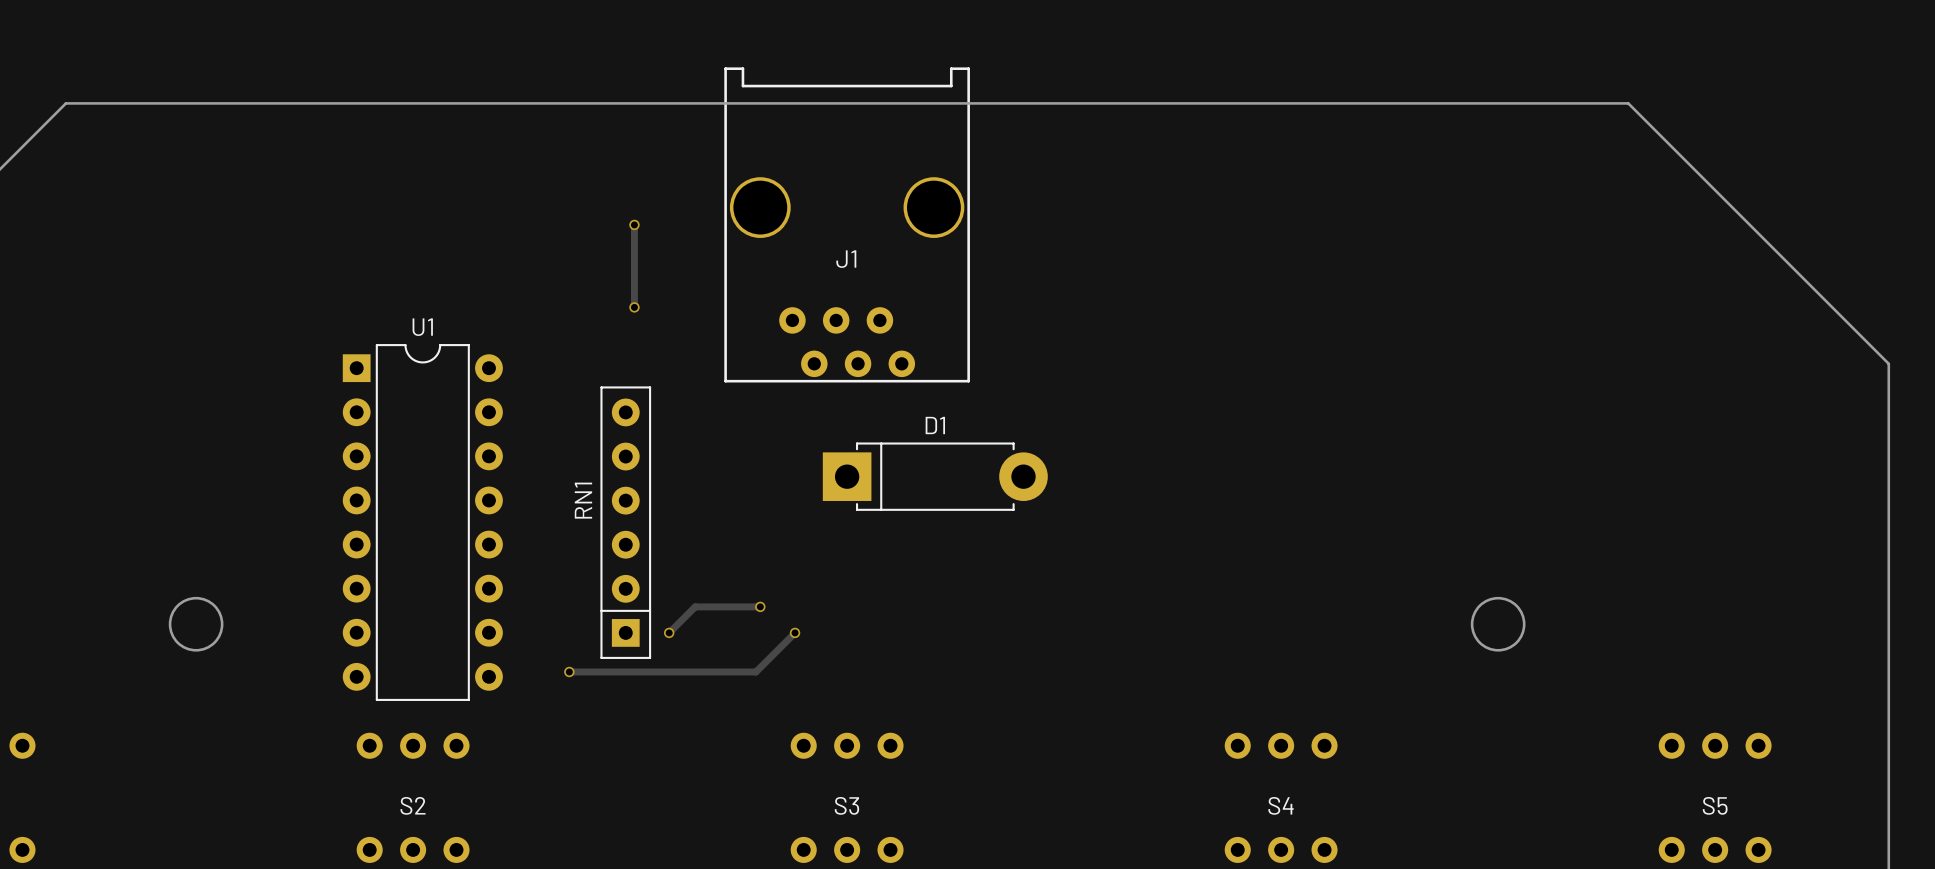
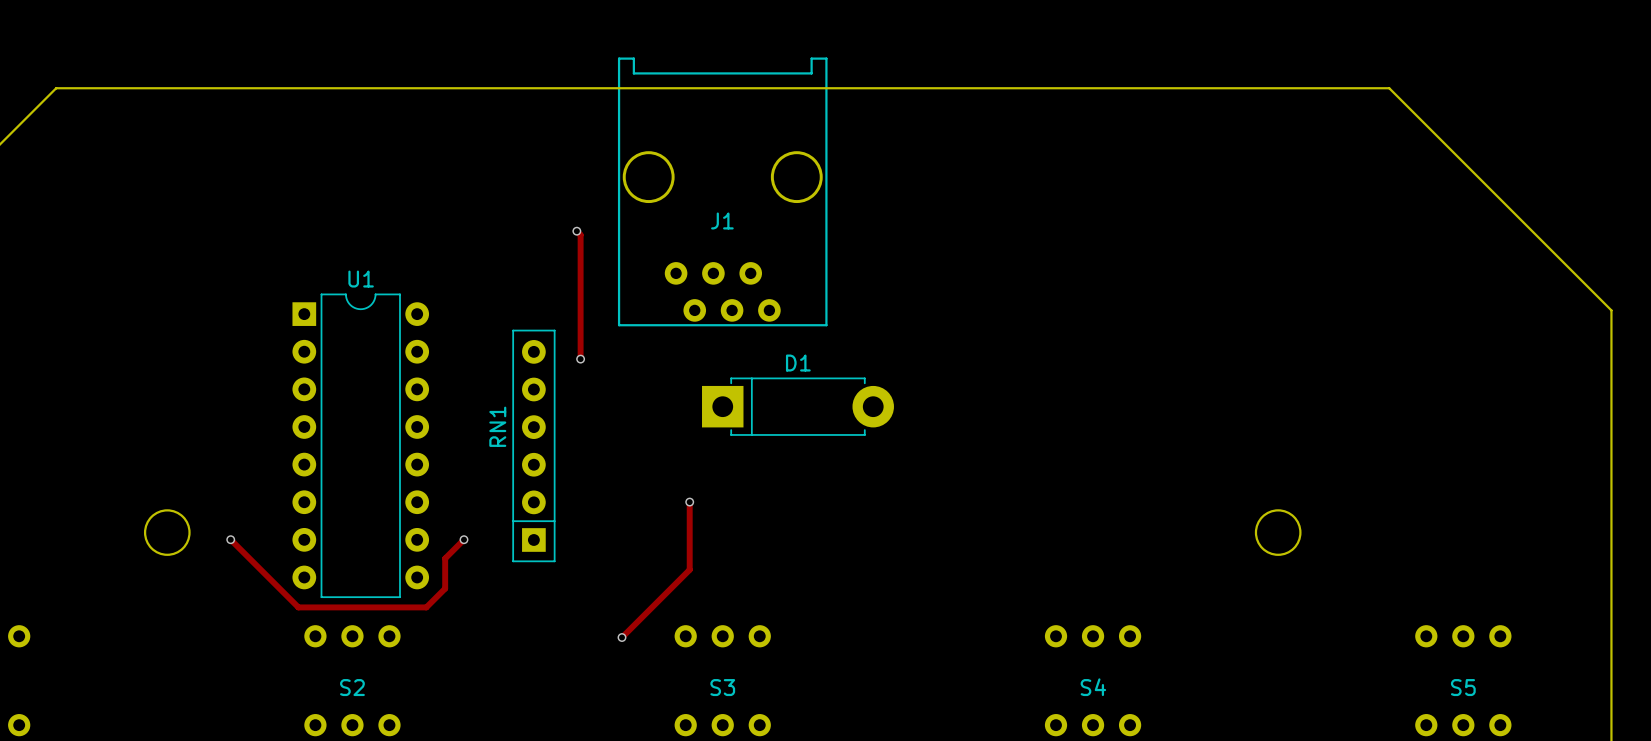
track: (634, 224) (634, 307) -> none
via: (634, 224) -> none
track: none -> (576, 231) (580, 234) (580, 359)
via: none -> (576, 231)
via: (634, 307) -> none
via: none -> (580, 359)
track: none -> (689, 502) (689, 569) (621, 637)
via: none -> (689, 502)
track: (760, 606) (695, 606) (669, 632) -> none
via: (760, 606) -> none
track: none -> (230, 539) (298, 607) (426, 607) (445, 588) (445, 558) (463, 539)
via: none -> (230, 539)
via: (669, 632) -> none
track: (795, 632) (755, 671) (569, 671) -> none
via: (795, 632) -> none
via position: (569, 671) -> (463, 539)
via: none -> (621, 637)

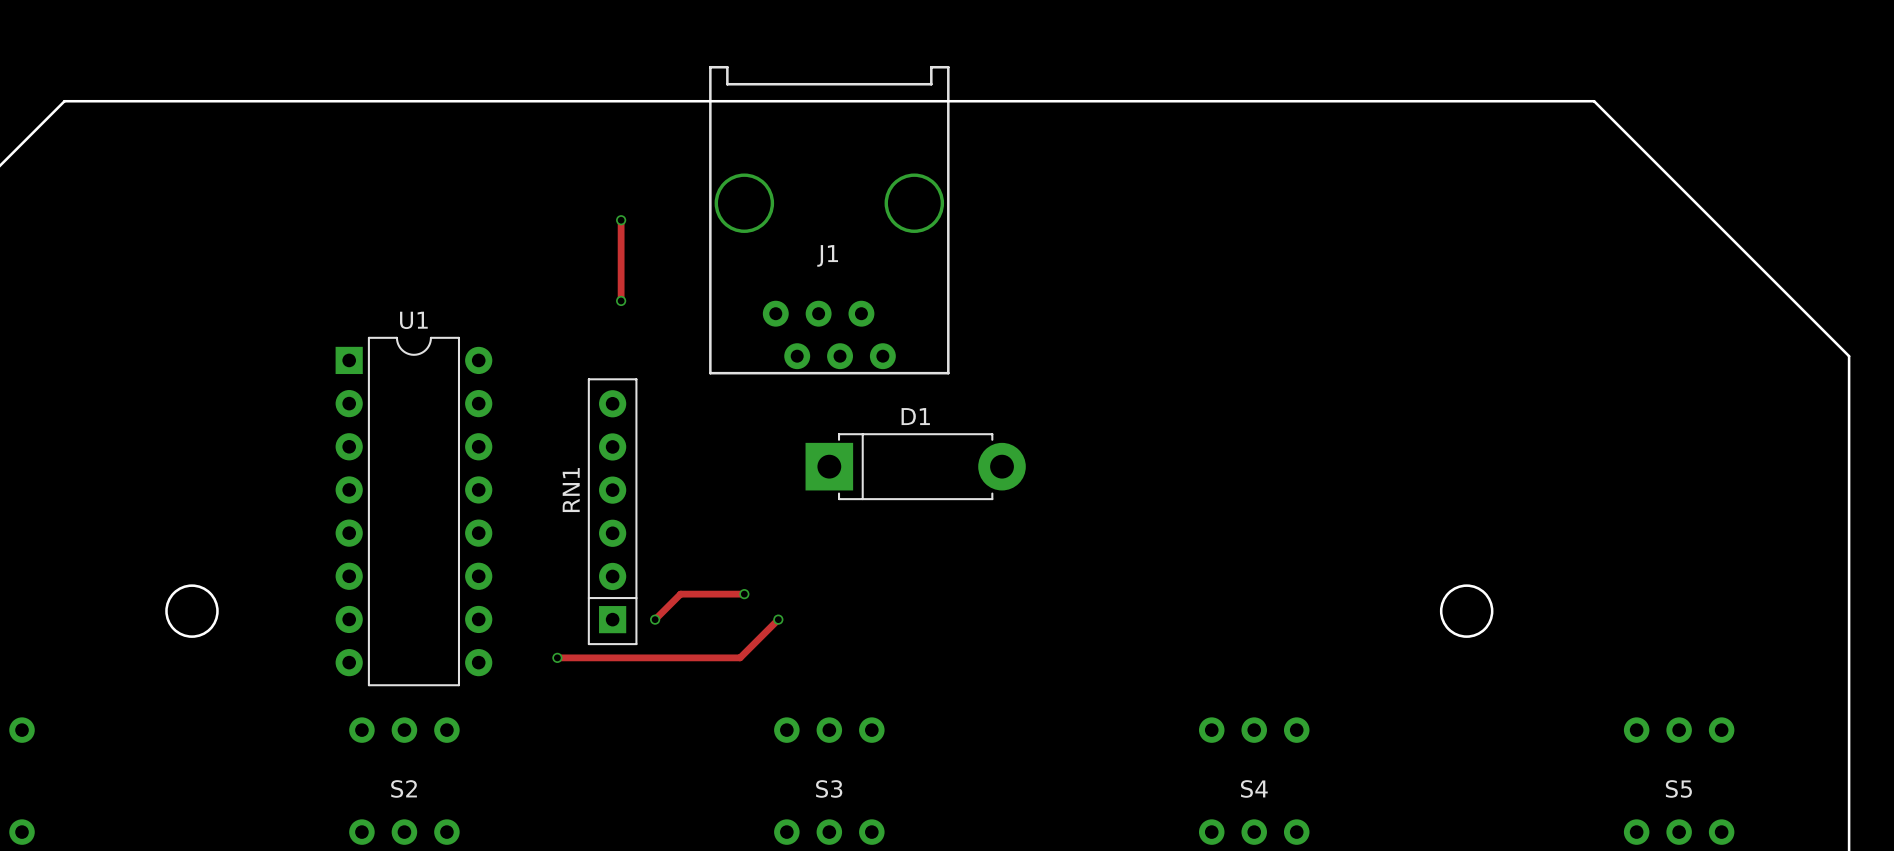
track: none -> (621, 220) (621, 300)
via: none -> (621, 220)
track: (576, 231) (580, 234) (580, 359) -> none
via: (576, 231) -> none
via: none -> (621, 300)
via: (580, 359) -> none
track: (689, 502) (689, 569) (621, 637) -> none
via: (689, 502) -> none
track: none -> (744, 594) (680, 594) (655, 619)
via: none -> (744, 594)
track: (230, 539) (298, 607) (426, 607) (445, 588) (445, 558) (463, 539) -> none
via: (230, 539) -> none
via position: (463, 539) -> (557, 657)
via: none -> (655, 619)
track: none -> (778, 619) (740, 657) (557, 657)
via: none -> (778, 619)
via: (621, 637) -> none

